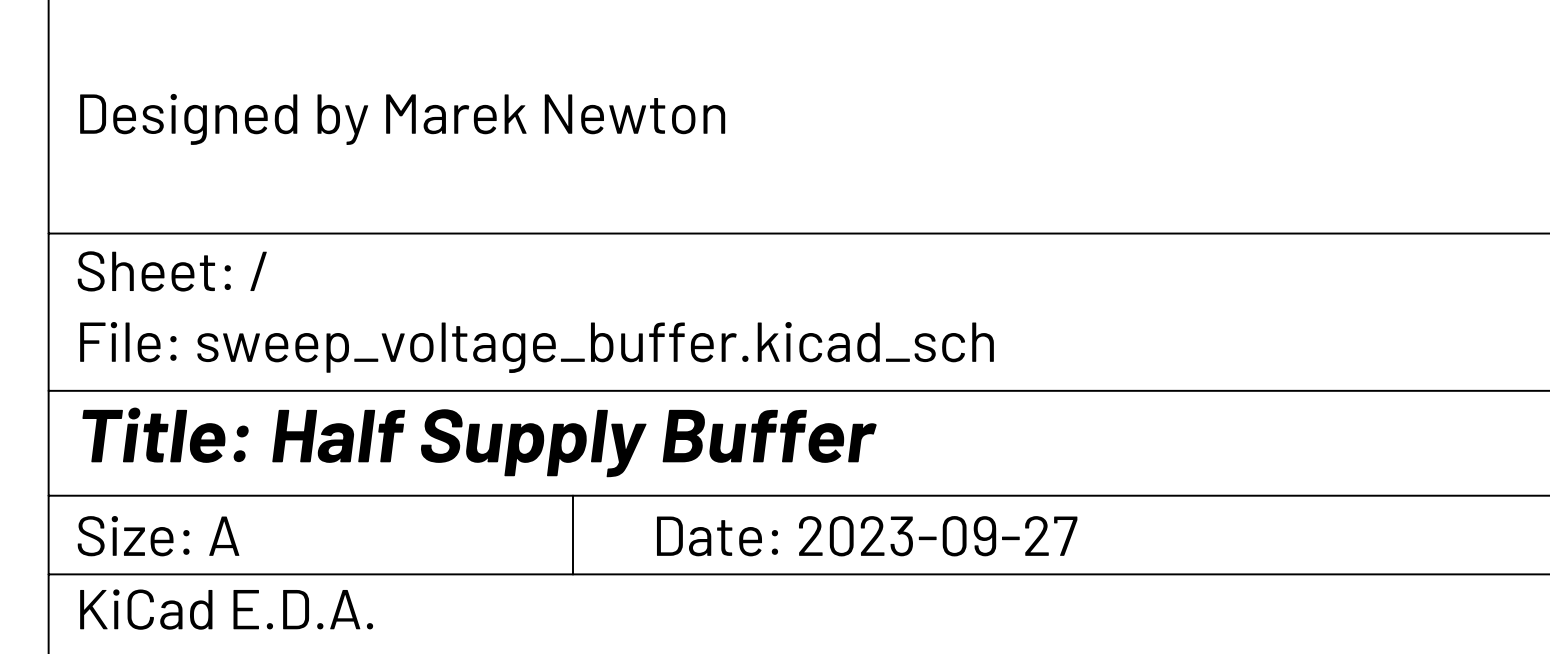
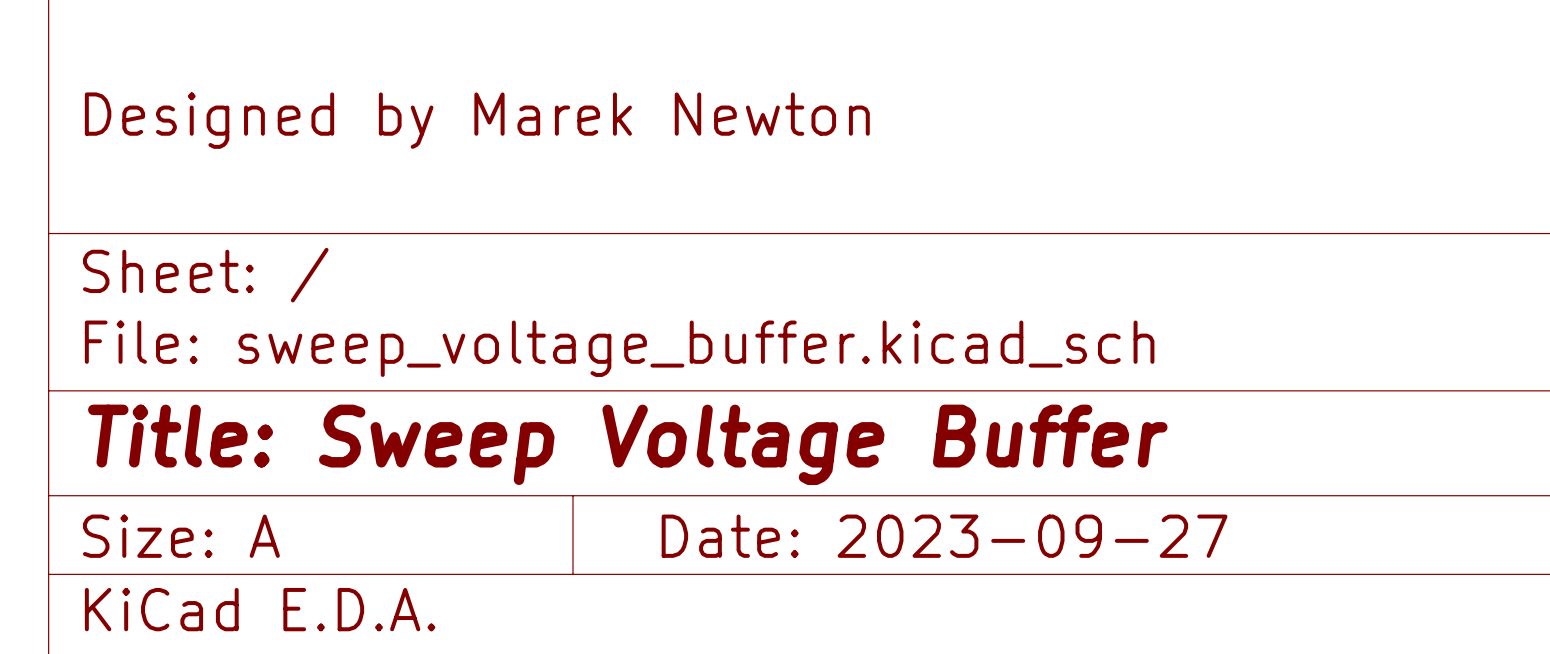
title block: Title: Half Supply Buffer (479, 442) -> Title: Sweep Voltage Buffer (627, 444)

